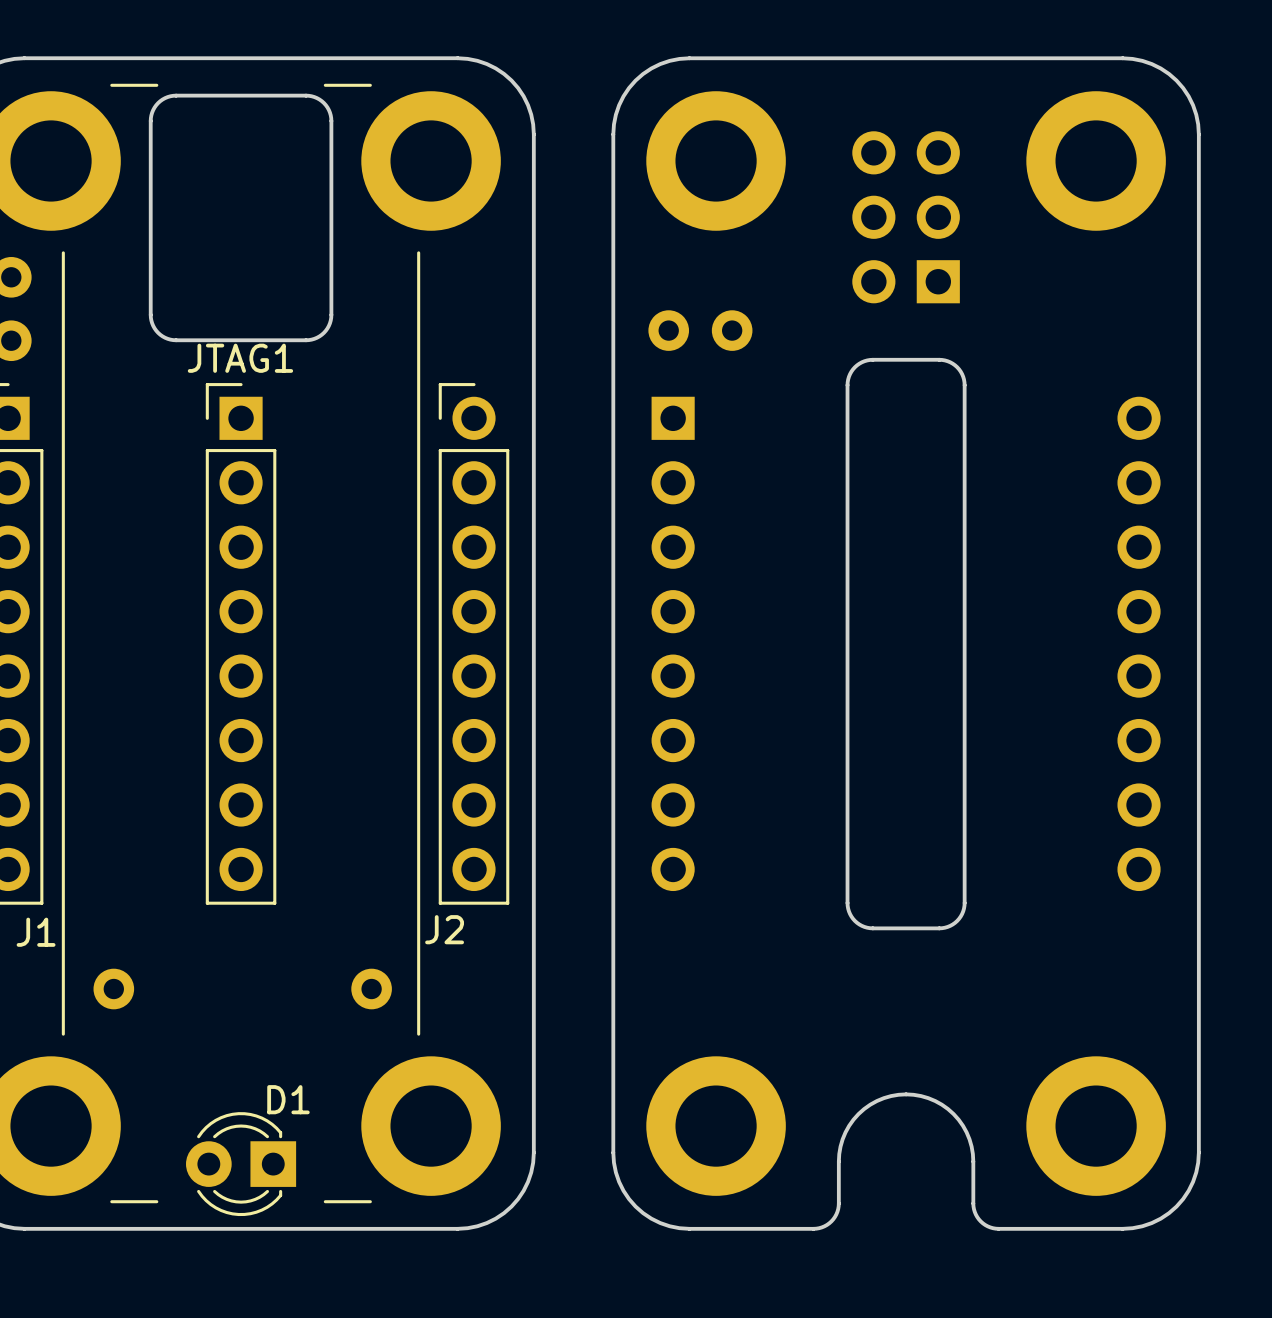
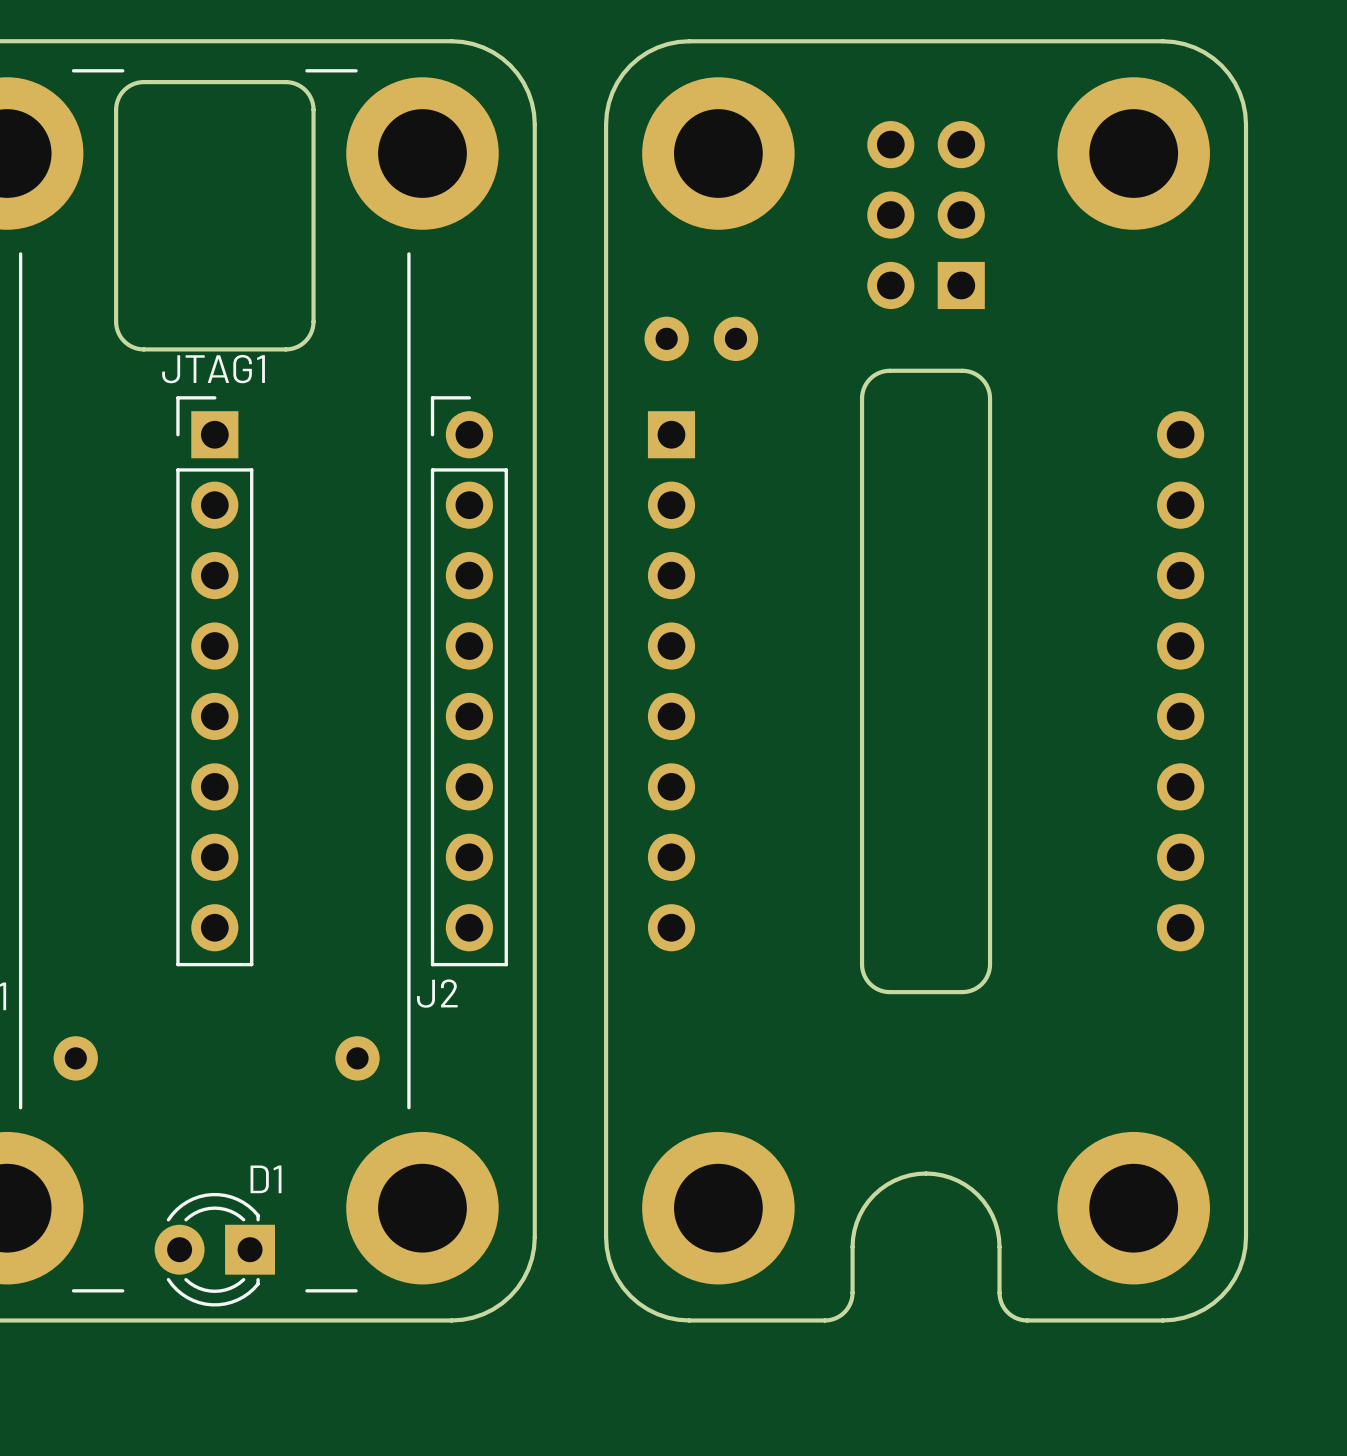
board edge: (689, 58) (660, 64) (635, 80) (619, 105) (613, 134) (613, 1162) (619, 1181) (635, 1206) (660, 1223) (689, 1228) -> (704, 41) (667, 44) (638, 58) (617, 82) (608, 102) (606, 124) (606, 1248) (617, 1278) (638, 1303) (667, 1317) (704, 1320)
board edge: (1108, 58) (1142, 60) (1169, 74) (1188, 96) (1198, 124) (1198, 1152) (1193, 1181) (1183, 1199) (1169, 1213) (1142, 1226) (1108, 1228) -> (1162, 41) (1194, 47) (1221, 65) (1239, 92) (1246, 124) (1245, 1248) (1234, 1278) (1213, 1303) (1184, 1317) (1162, 1320)
part position: (716, 160) -> (718, 153)
part position: (1096, 160) -> (1133, 153)
part position: (906, 217) -> (926, 215)
part position: (700, 330) -> (701, 338)
board edge: (872, 359) (861, 362) (854, 367) (848, 376) (847, 385) (847, 902) (848, 911) (854, 920) (861, 925) (872, 928) -> (905, 370) (886, 370) (875, 375) (864, 386) (862, 398) (862, 967) (866, 979) (875, 987) (886, 991) (905, 992)
board edge: (925, 359) (942, 359) (952, 363) (962, 374) (964, 385) (964, 905) (960, 916) (952, 924) (942, 928) (925, 928) -> (962, 370) (974, 373) (981, 378) (988, 389) (990, 398) (990, 964) (987, 976) (981, 984) (974, 989) (962, 992)
part position: (673, 643) -> (671, 681)
part position: (1139, 643) -> (1180, 681)
part position: (716, 1126) -> (718, 1208)
part position: (1096, 1126) -> (1133, 1208)
board edge: (799, 1228) (821, 1227) (831, 1221) (836, 1214) (838, 1206) (840, 1146) (845, 1132) (853, 1119) (864, 1109) (876, 1101) (891, 1096) (906, 1094) (921, 1096) (935, 1101) (953, 1114) (963, 1125) (969, 1139) (972, 1154) (974, 1211) (985, 1224) (998, 1228) -> (824, 1320) (839, 1316) (846, 1310) (851, 1301) (853, 1238) (856, 1222) (863, 1207) (874, 1195) (886, 1184) (901, 1177) (926, 1173) (942, 1175) (957, 1180) (971, 1189) (983, 1201) (992, 1215) (997, 1230) (999, 1295) (1002, 1304) (1007, 1312) (1018, 1318) (1042, 1320)

